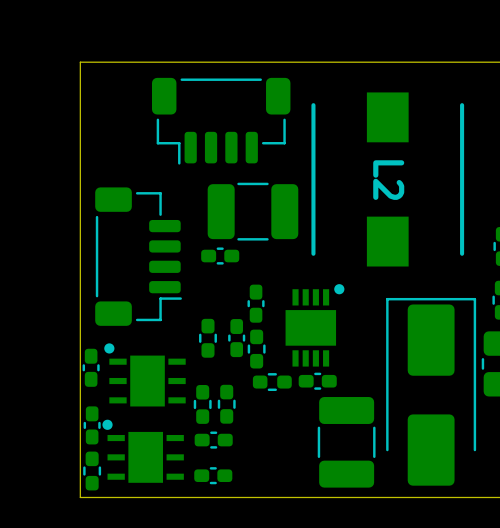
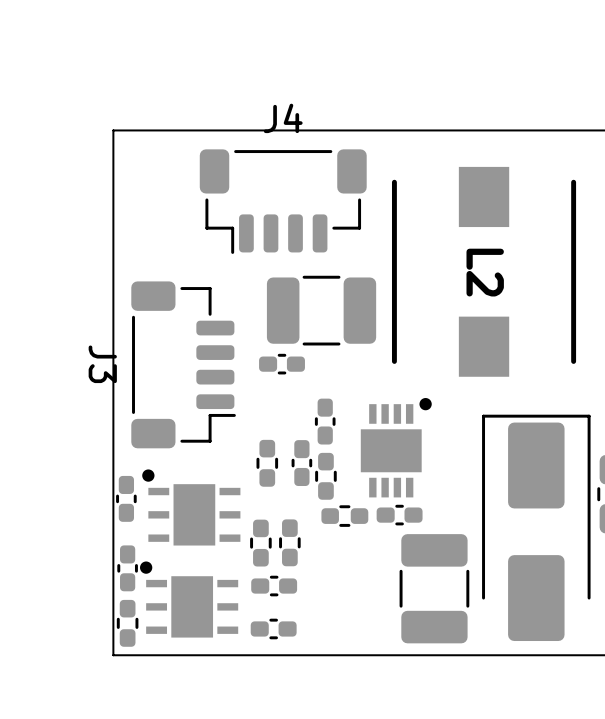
J4 name: none -> J4 (283, 118)
J3 name: none -> J3 (102, 364)

